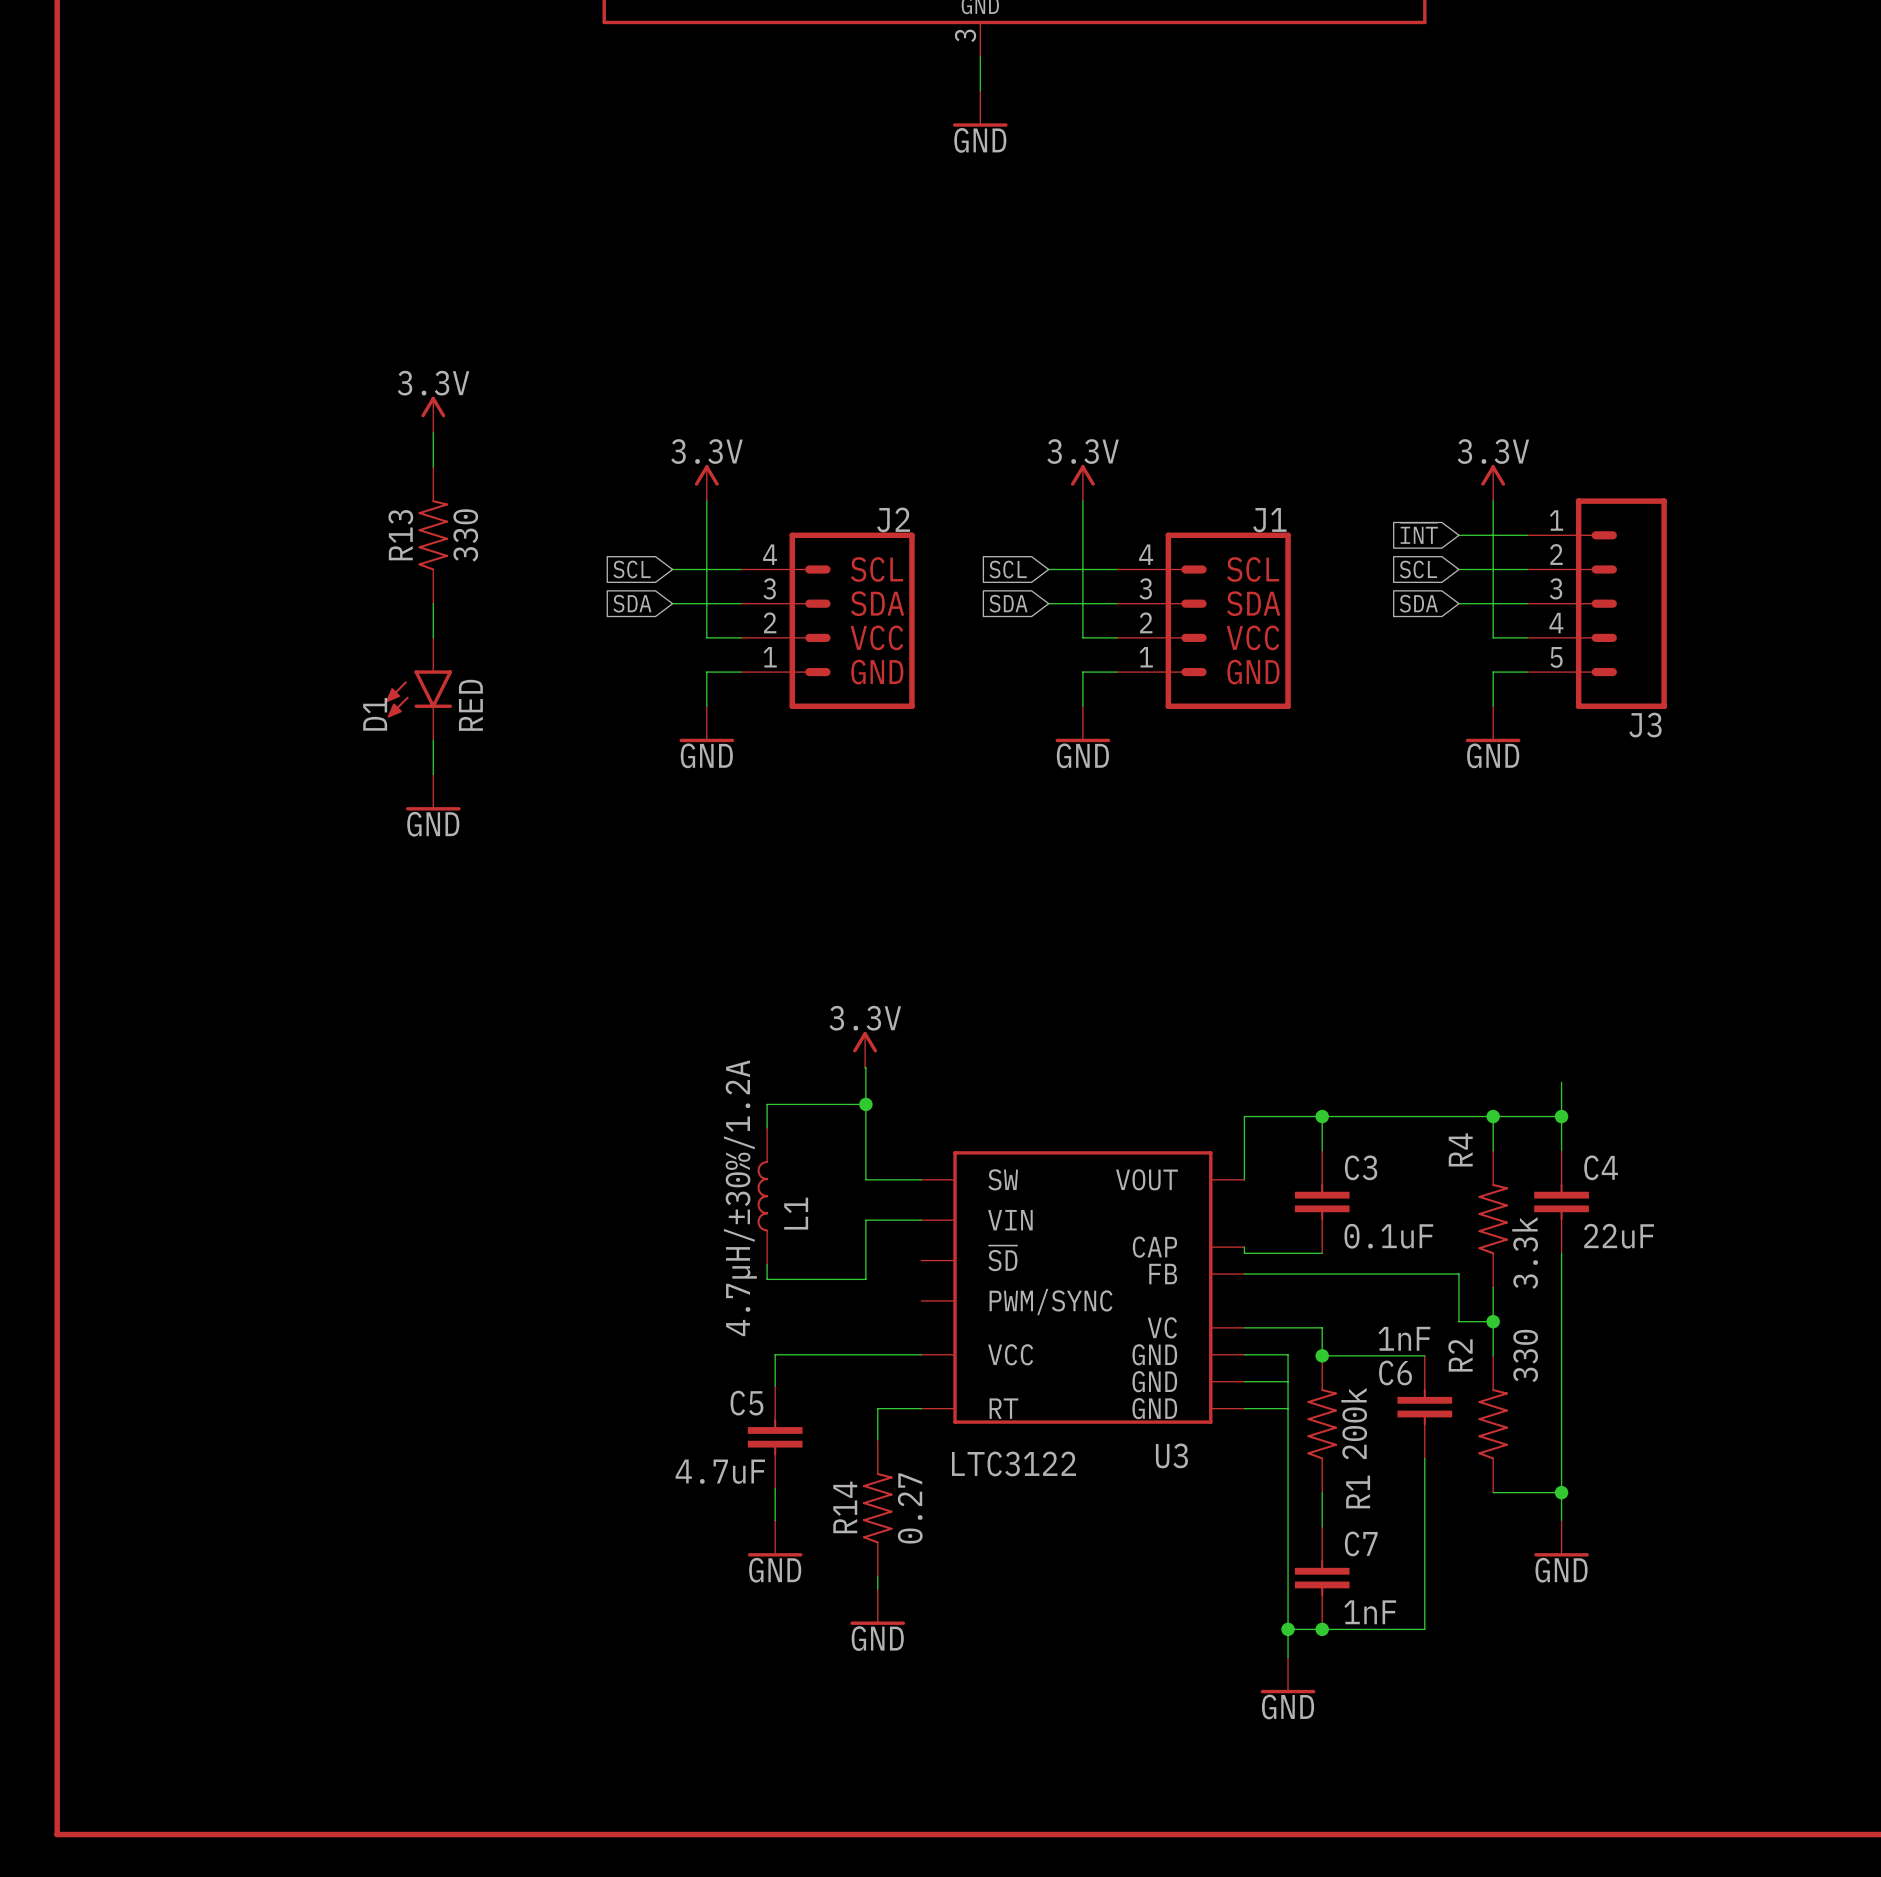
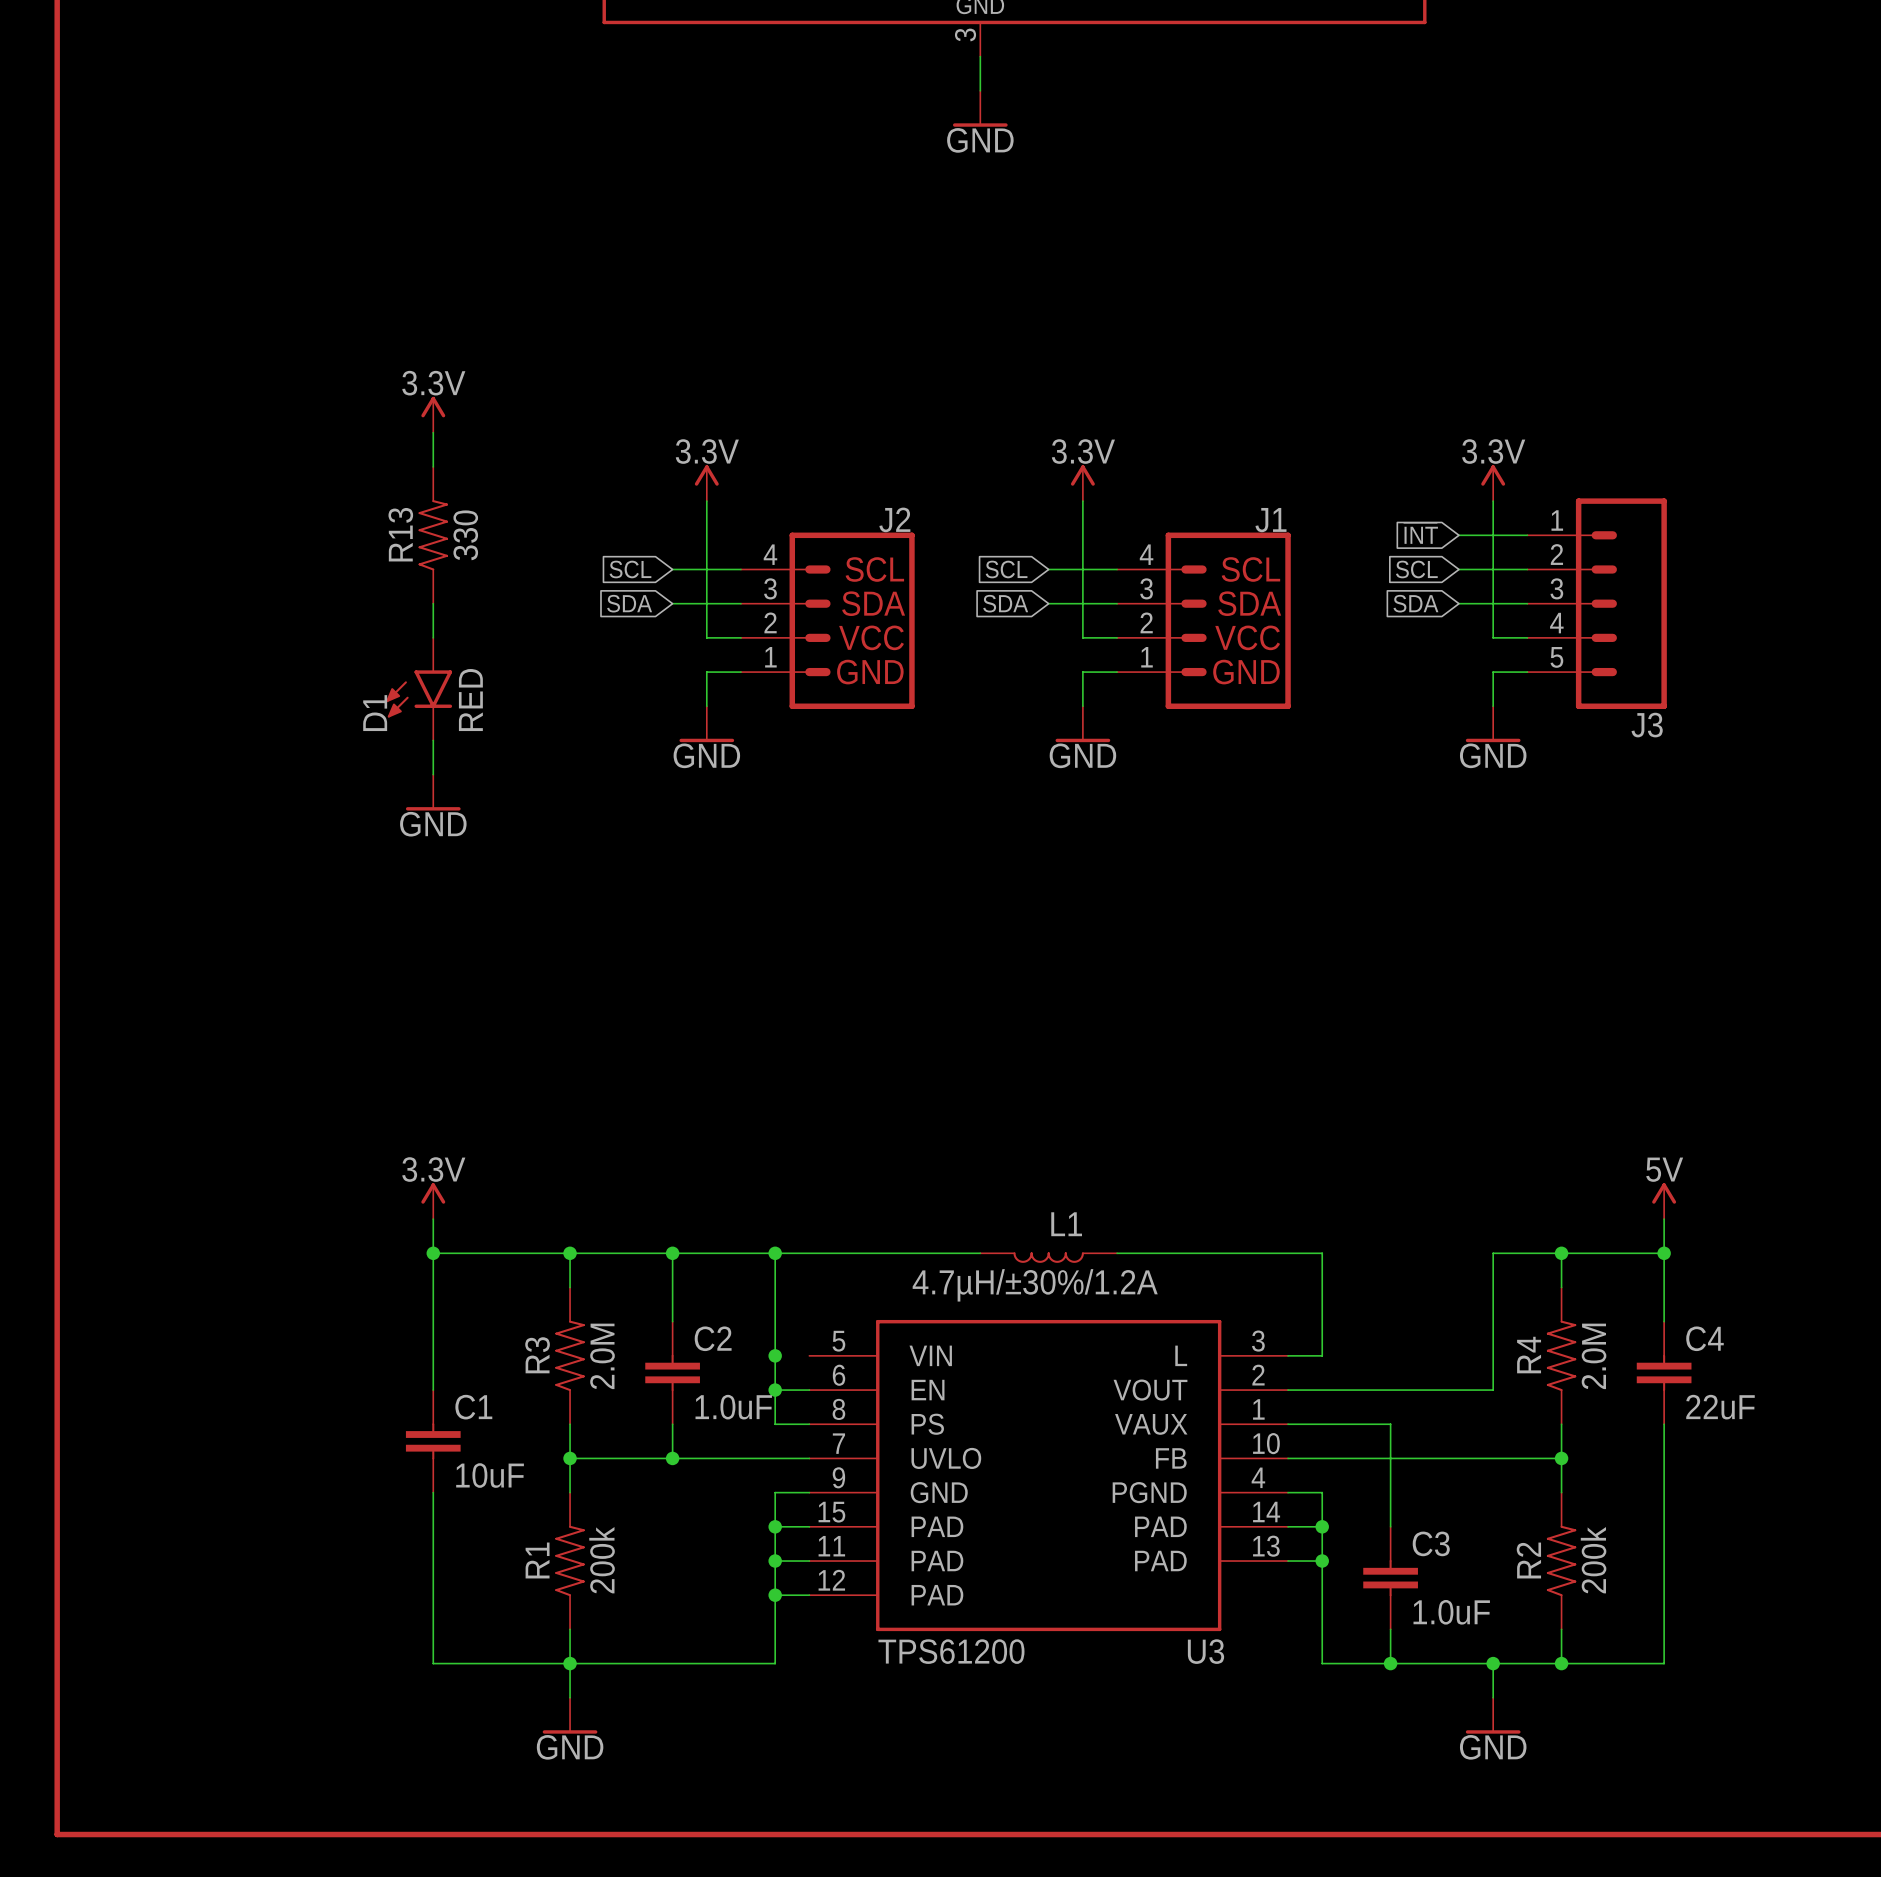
power symbol: 3.3V (865, 1049) -> none
wire: (865, 1067) (865, 1179) (921, 1179) -> none
wire: (1561, 1082) (1561, 1150) -> none
wire: (865, 1104) (767, 1104) (767, 1127) -> none
junction: (865, 1104) -> none
wire: (1322, 1116) (1322, 1150) -> none
junction: (1322, 1116) -> none
wire: (1493, 1116) (1493, 1150) -> none
junction: (1493, 1116) -> none
wire: (1561, 1116) (1244, 1116) (1244, 1179) -> none
junction: (1561, 1116) -> none
R4 name position: R4 (1460, 1149) -> R4 (1529, 1355)
U3 symbol: [921, 1151, 1245, 1424] -> [809, 1319, 1289, 1632]
L1 rotation: 0° (762, 1196) -> 90° counterclockwise (1048, 1257)
L1 position: (762, 1196) -> (1048, 1257)
power symbol: none -> 3.3V (433, 1201)
power symbol: none -> 5V (1664, 1201)
C3 position: (1322, 1202) -> (1390, 1578)
C4 position: (1561, 1202) -> (1664, 1372)
wire: none -> (433, 1219) (433, 1390)
R4 position: (1493, 1219) -> (1561, 1355)
wire: none -> (1664, 1219) (1664, 1321)
wire: (921, 1220) (865, 1220) (865, 1279) (767, 1279) (767, 1264) -> none
C3 value: 0.1uF (1388, 1236) -> 1.0uF (1451, 1612)
wire: (1244, 1247) (1244, 1253) -> (1117, 1253) (1244, 1253)
R4 value: 3.3k (1525, 1252) -> 2.0M (1594, 1356)
wire: none -> (433, 1253) (980, 1253)
junction: none -> (433, 1253)
wire: none -> (570, 1253) (570, 1287)
junction: none -> (570, 1253)
wire: none -> (672, 1253) (672, 1321)
junction: none -> (672, 1253)
junction: none -> (775, 1253)
junction: none -> (1561, 1253)
wire: none -> (1664, 1253) (1493, 1253) (1493, 1287)
junction: none -> (1664, 1253)
wire: (1244, 1274) (1458, 1274) (1458, 1321) (1493, 1321) -> none
junction: (1493, 1321) -> none
wire: (1244, 1327) (1322, 1327) -> (1322, 1253) (1322, 1327)
wire: (775, 1354) (921, 1354) -> (775, 1354) (775, 1253)
wire: (1244, 1354) (1288, 1354) (1288, 1657) -> none
R3: none -> 2.0M (570, 1355)
junction: none -> (775, 1355)
wire: (1322, 1355) (1424, 1355) -> (1322, 1355) (1288, 1355)
junction: (1322, 1355) -> none
R2 name position: R2 (1460, 1355) -> R2 (1528, 1560)
wire: none -> (1493, 1355) (1493, 1390) (1288, 1390)
R2 value: 330 (1525, 1355) -> 200k (1593, 1560)
C2: none -> 1.0uF (672, 1372)
wire: (1244, 1381) (1288, 1381) -> none
wire: none -> (775, 1386) (775, 1424) (809, 1424)
wire: none -> (775, 1390) (809, 1390)
junction: none -> (775, 1390)
C6: 1nF (1424, 1407) -> none
wire: (921, 1408) (877, 1408) (877, 1439) -> none
wire: (1244, 1408) (1288, 1408) -> none
wire: none -> (570, 1424) (570, 1492)
wire: none -> (672, 1424) (672, 1458)
wire: none -> (1288, 1424) (1390, 1424) (1390, 1526)
R1 position: (1322, 1424) -> (570, 1561)
R2 position: (1493, 1424) -> (1561, 1561)
wire: none -> (1664, 1424) (1664, 1663) (1322, 1663) (1322, 1526) (1288, 1526)
C5: 4.7uF (775, 1437) -> none
C1: none -> 10uF (433, 1441)
U3 name position: U3 (1171, 1455) -> U3 (1205, 1651)
wire: none -> (570, 1458) (809, 1458)
junction: none -> (570, 1458)
junction: none -> (672, 1458)
wire: none -> (1288, 1458) (1561, 1458)
wire: (1424, 1458) (1424, 1629) (1288, 1629) -> none
U3 value: LTC3122 (1013, 1463) -> TPS61200 (951, 1651)
wire: (775, 1488) (775, 1492) -> (809, 1492) (775, 1492)
R1 name position: R1 (1358, 1491) -> R1 (537, 1560)
wire: none -> (433, 1492) (433, 1663) (775, 1663) (775, 1520)
wire: none -> (1288, 1492) (1322, 1492)
wire: (1493, 1492) (1561, 1492) (1561, 1520) -> none
junction position: (1561, 1492) -> (1561, 1458)
R14: 0.27 (877, 1508) -> none
wire: none -> (775, 1526) (809, 1526)
junction: none -> (775, 1526)
junction: none -> (1322, 1526)
power symbol: GND (775, 1538) -> none
power symbol: GND (1561, 1538) -> none
wire: none -> (775, 1561) (809, 1561)
junction: none -> (775, 1561)
wire: none -> (1288, 1561) (1322, 1561)
junction: none -> (1322, 1561)
C7: 1nF (1322, 1578) -> none
wire: none -> (775, 1595) (809, 1595)
junction: none -> (775, 1595)
power symbol: GND (877, 1606) -> none
wire: none -> (570, 1629) (570, 1697)
junction: (1288, 1629) -> none
junction: (1322, 1629) -> none
wire: none -> (1390, 1629) (1390, 1663)
wire: none -> (1561, 1629) (1561, 1663)
junction: none -> (570, 1663)
junction: none -> (1390, 1663)
wire: none -> (1493, 1663) (1493, 1697)
junction: none -> (1493, 1663)
junction: none -> (1561, 1663)
power symbol: GND (1288, 1675) -> none
power symbol: none -> GND (570, 1715)
power symbol: none -> GND (1493, 1715)

